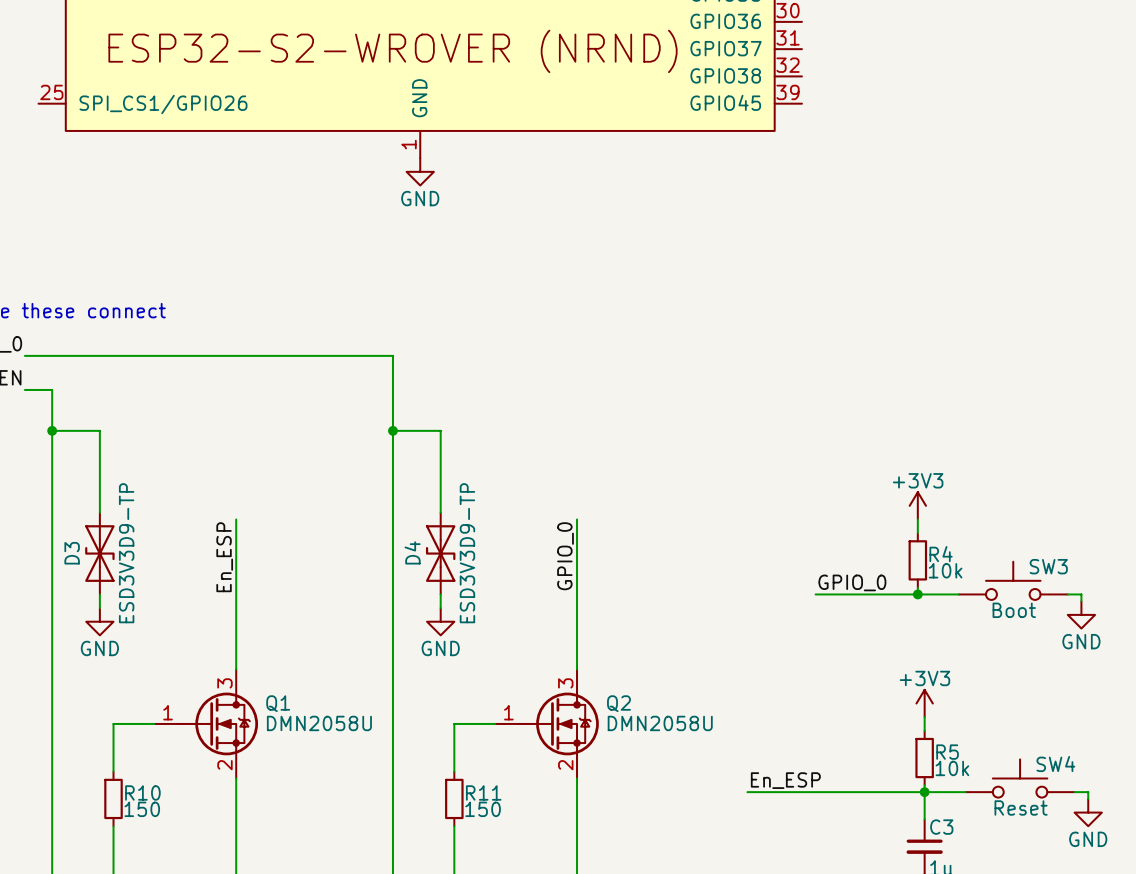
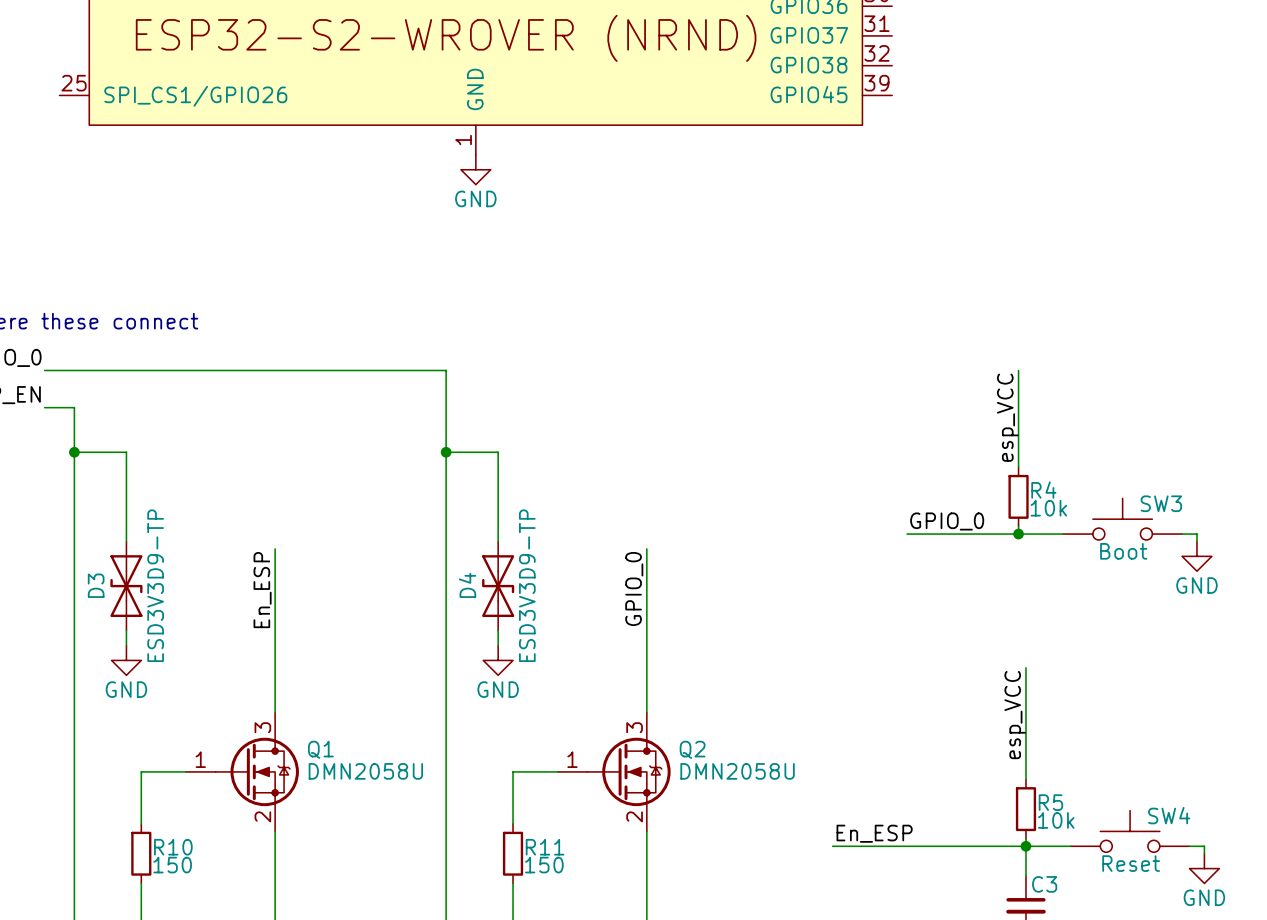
wire: none -> (1018, 370) (1018, 467)
label: none -> esp_VCC (1007, 417)
junction: none -> (1018, 534)
power symbol: +3V3 (917, 505) -> none
wire: (917, 519) (917, 533) -> none
R4 position: (917, 560) -> (1018, 496)
SW3 position: (1013, 580) -> (1122, 519)
label position: GPIO_0 (852, 582) -> GPIO_0 (947, 521)
wire: (815, 594) (958, 594) -> (907, 534) (1063, 534)
junction: (917, 594) -> none
wire: (1067, 594) (1081, 594) (1081, 601) -> (1182, 534) (1196, 534) (1196, 541)
power symbol position: GND (1081, 614) -> GND (1196, 556)
wire: none -> (1025, 667) (1025, 764)
label: none -> esp_VCC (1015, 715)
power symbol: +3V3 (924, 703) -> none

